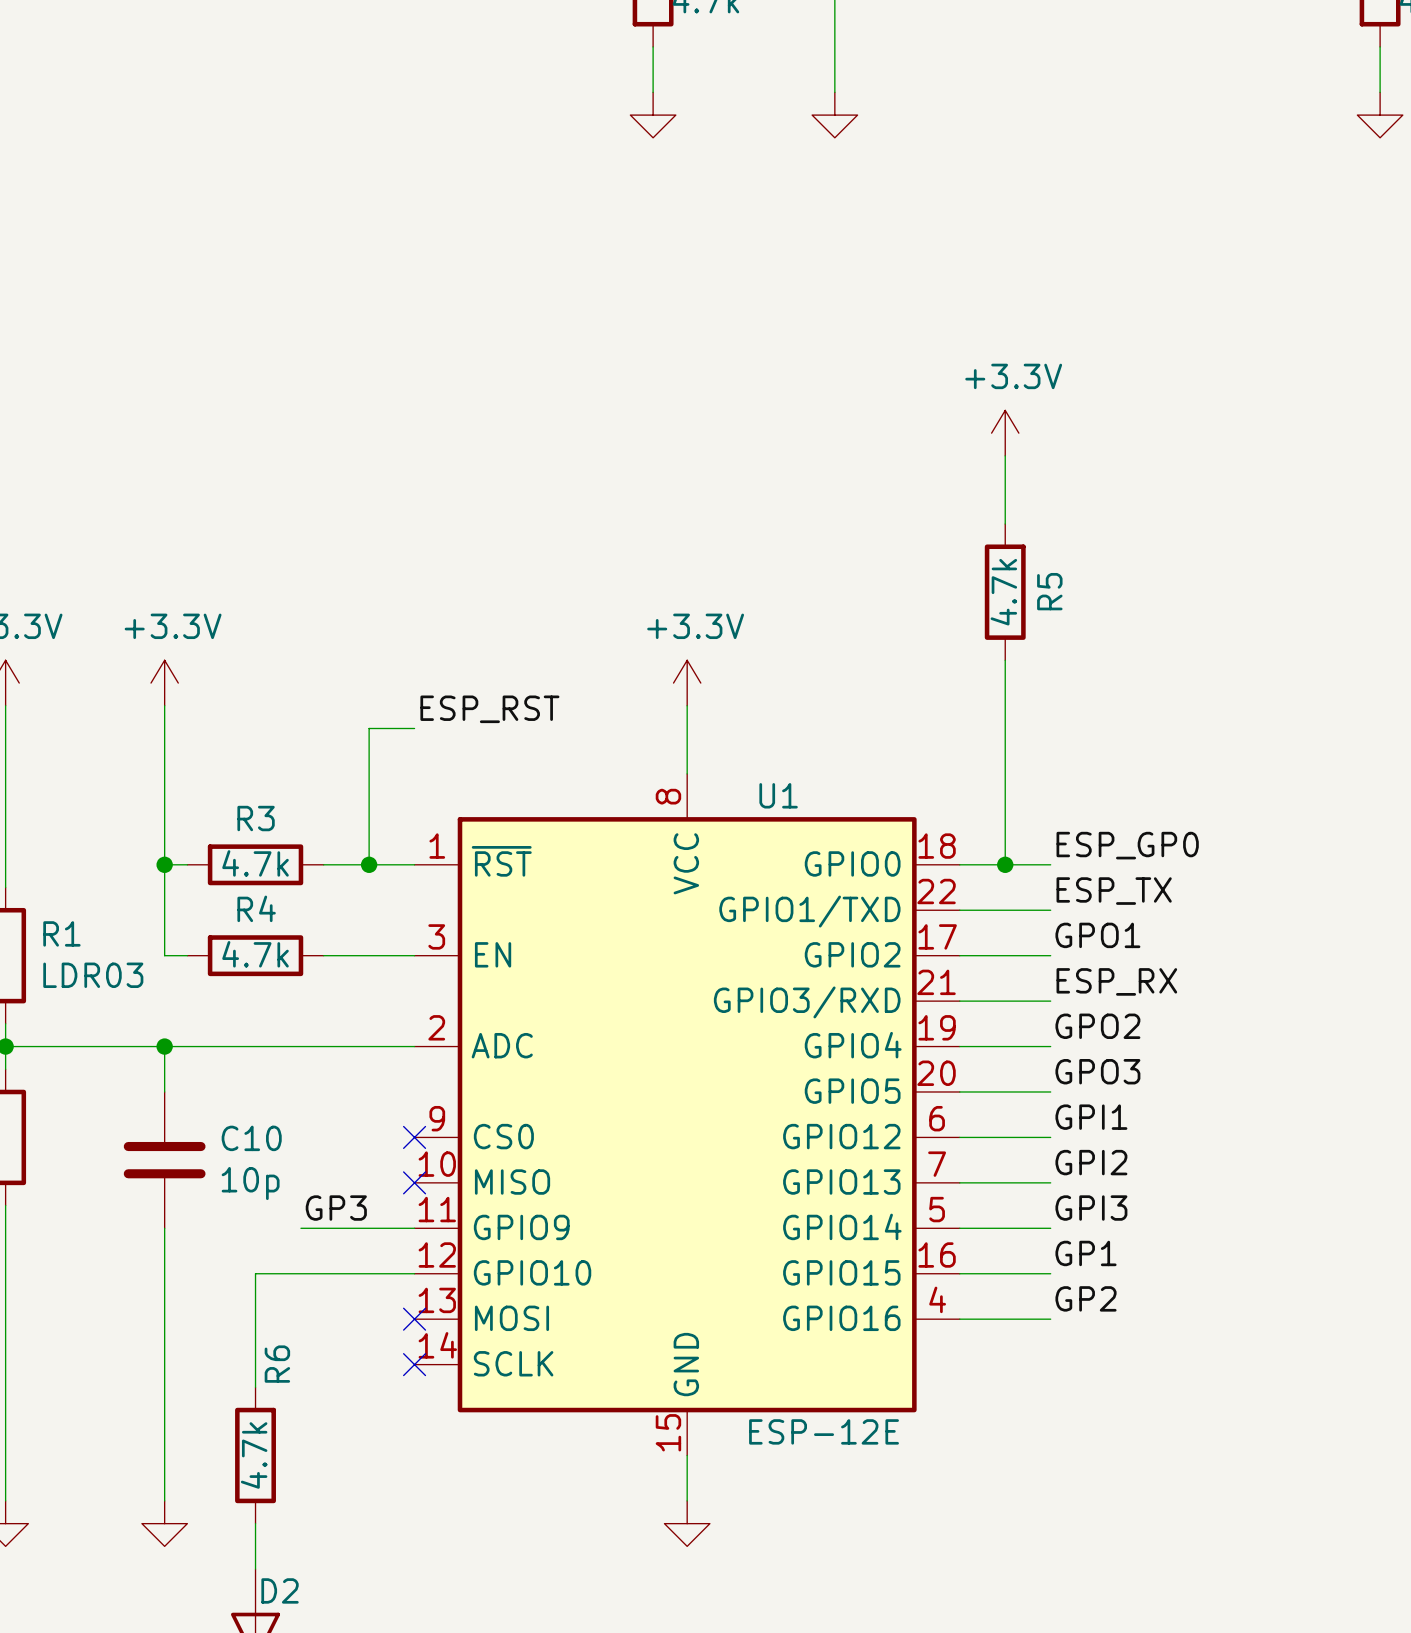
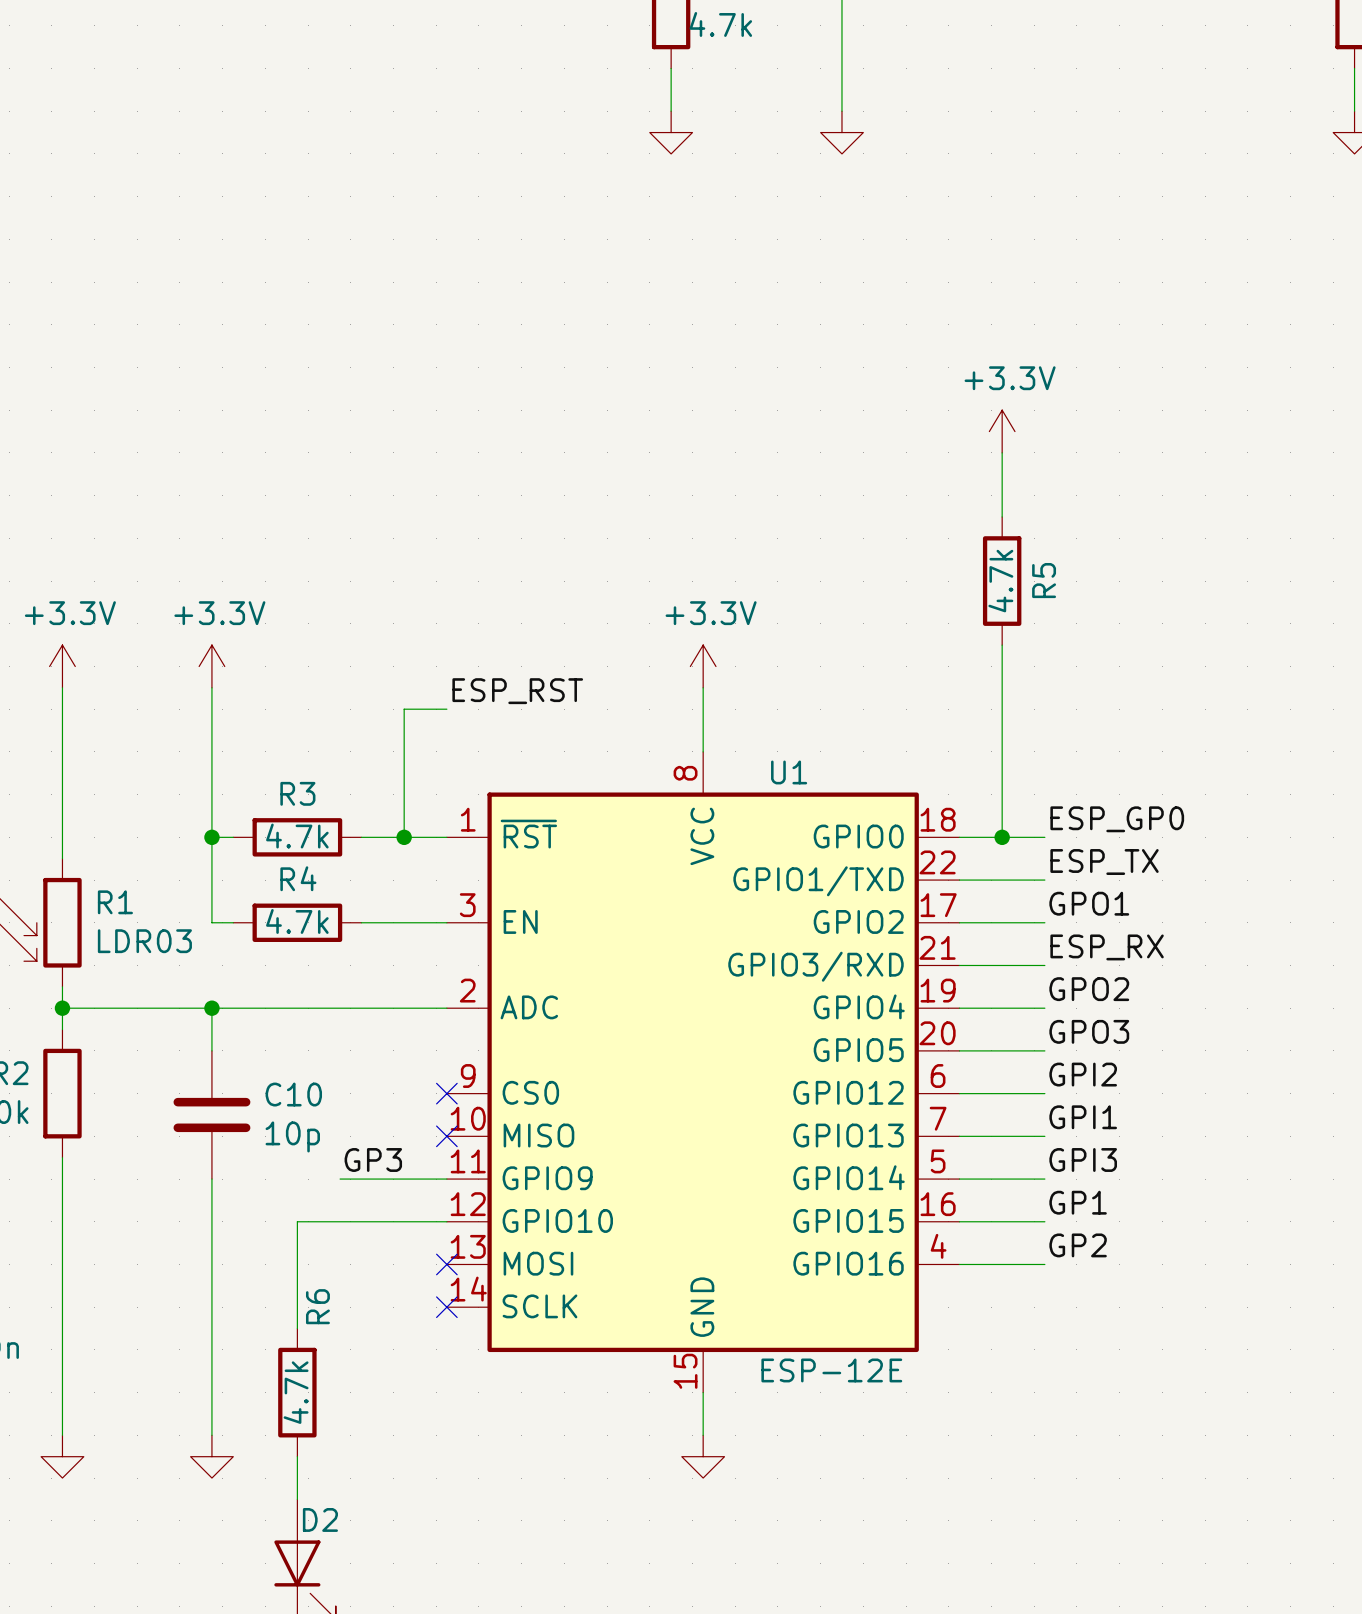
label: GPI1 (1091, 1117) -> GPI2 (1083, 1074)
label: GPI2 (1091, 1162) -> GPI1 (1083, 1117)

